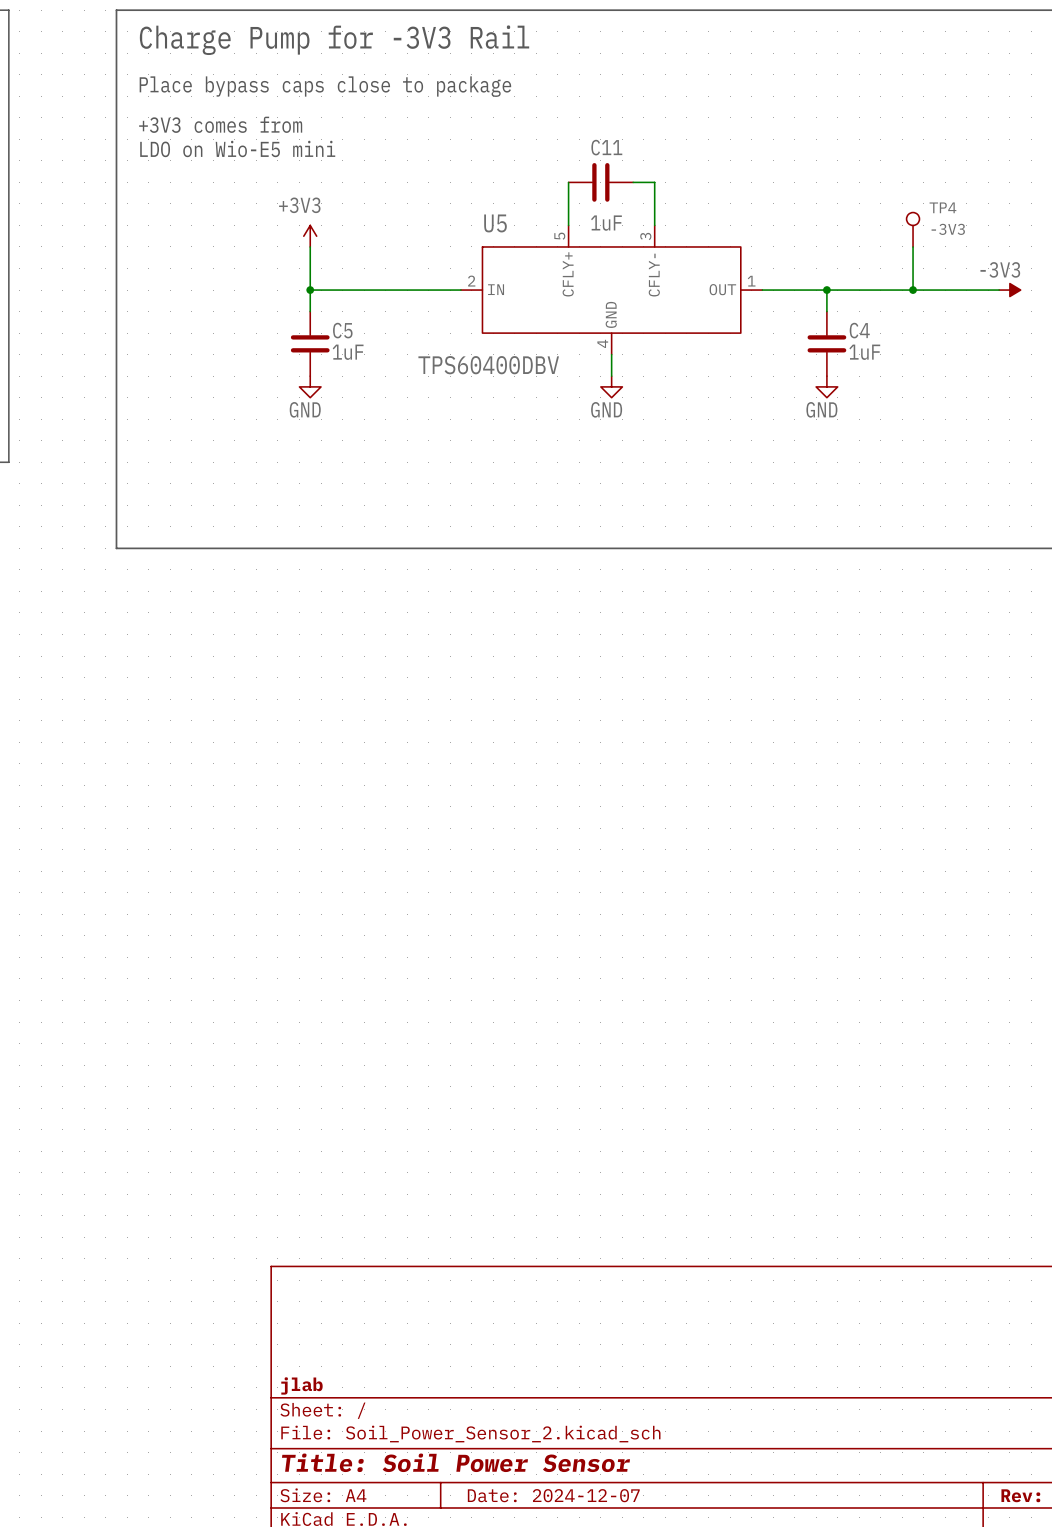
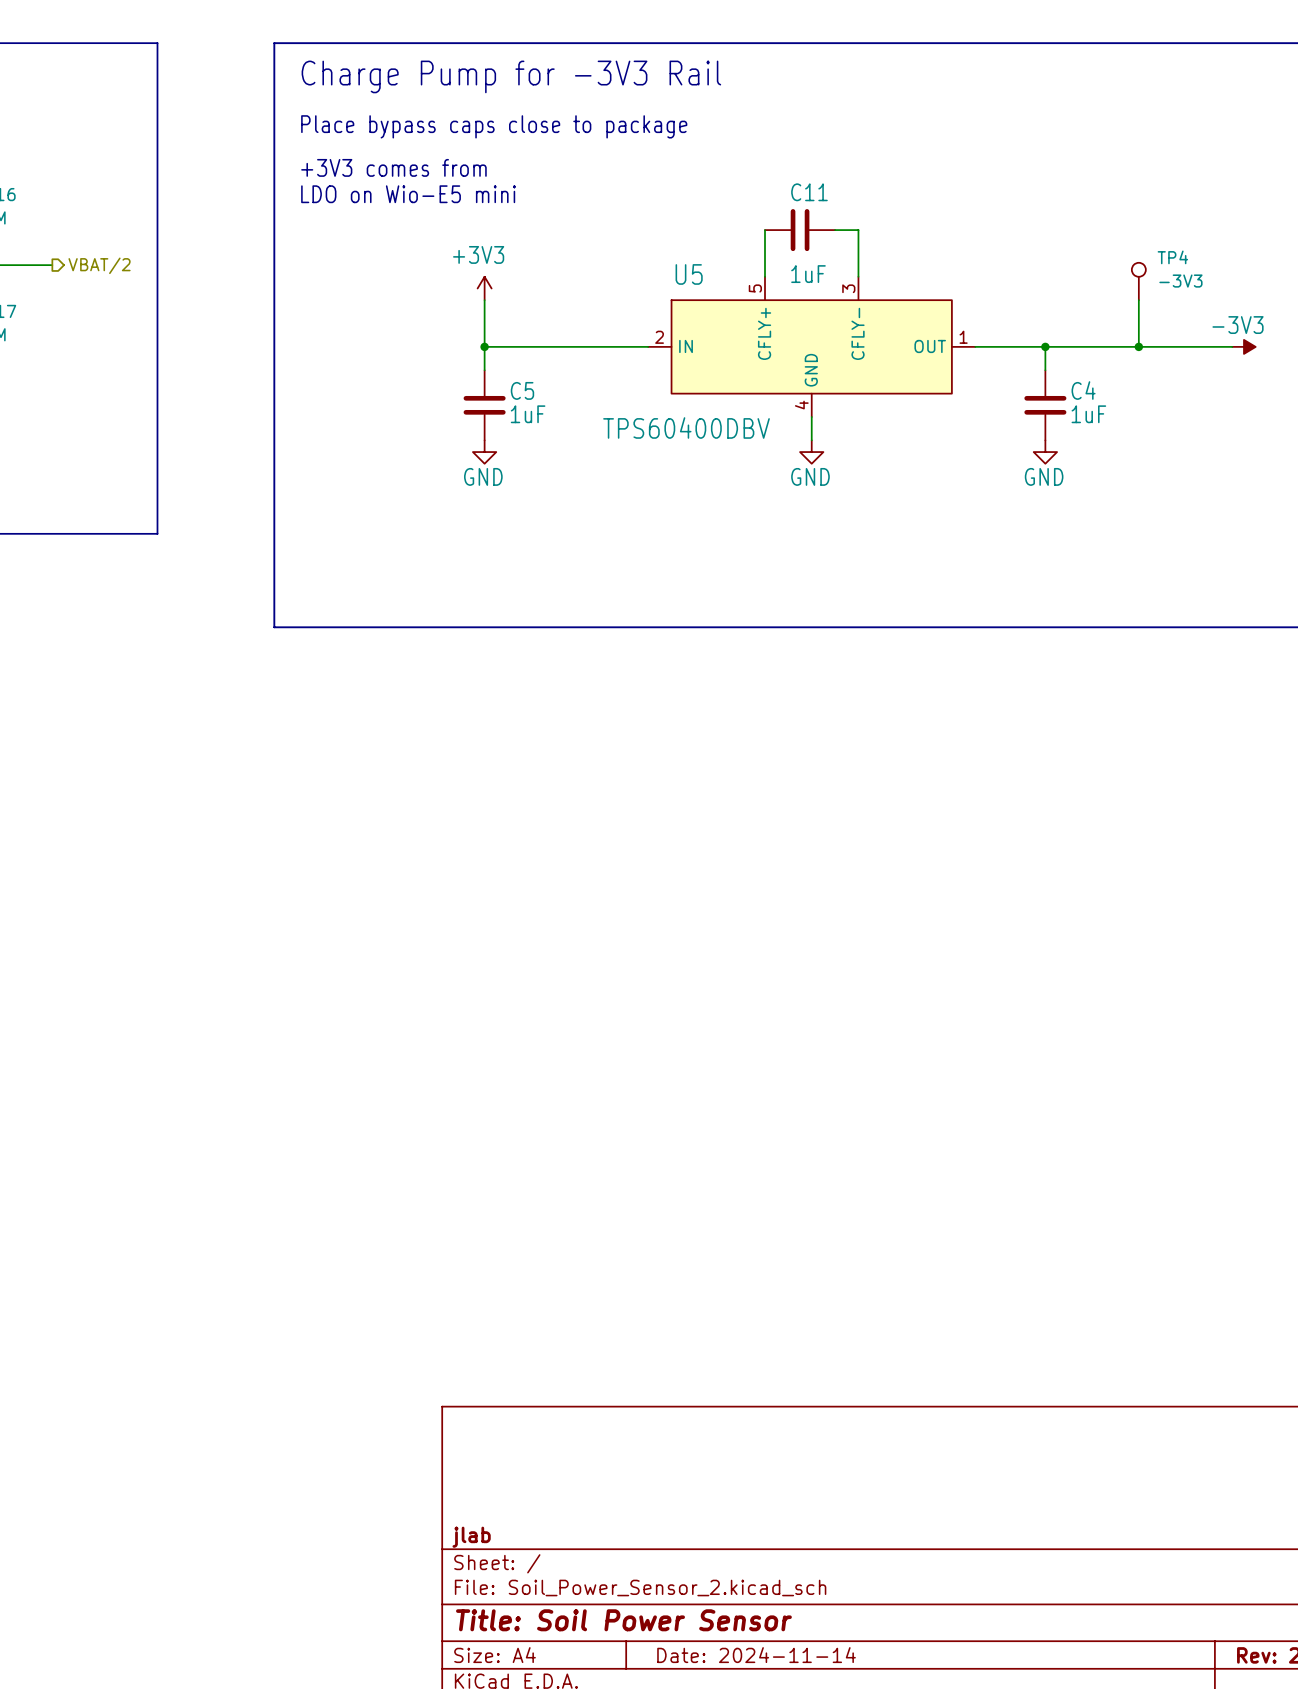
title block: Date: 2024-12-07 (553, 1495) -> Date: 2024-11-14 (756, 1655)

